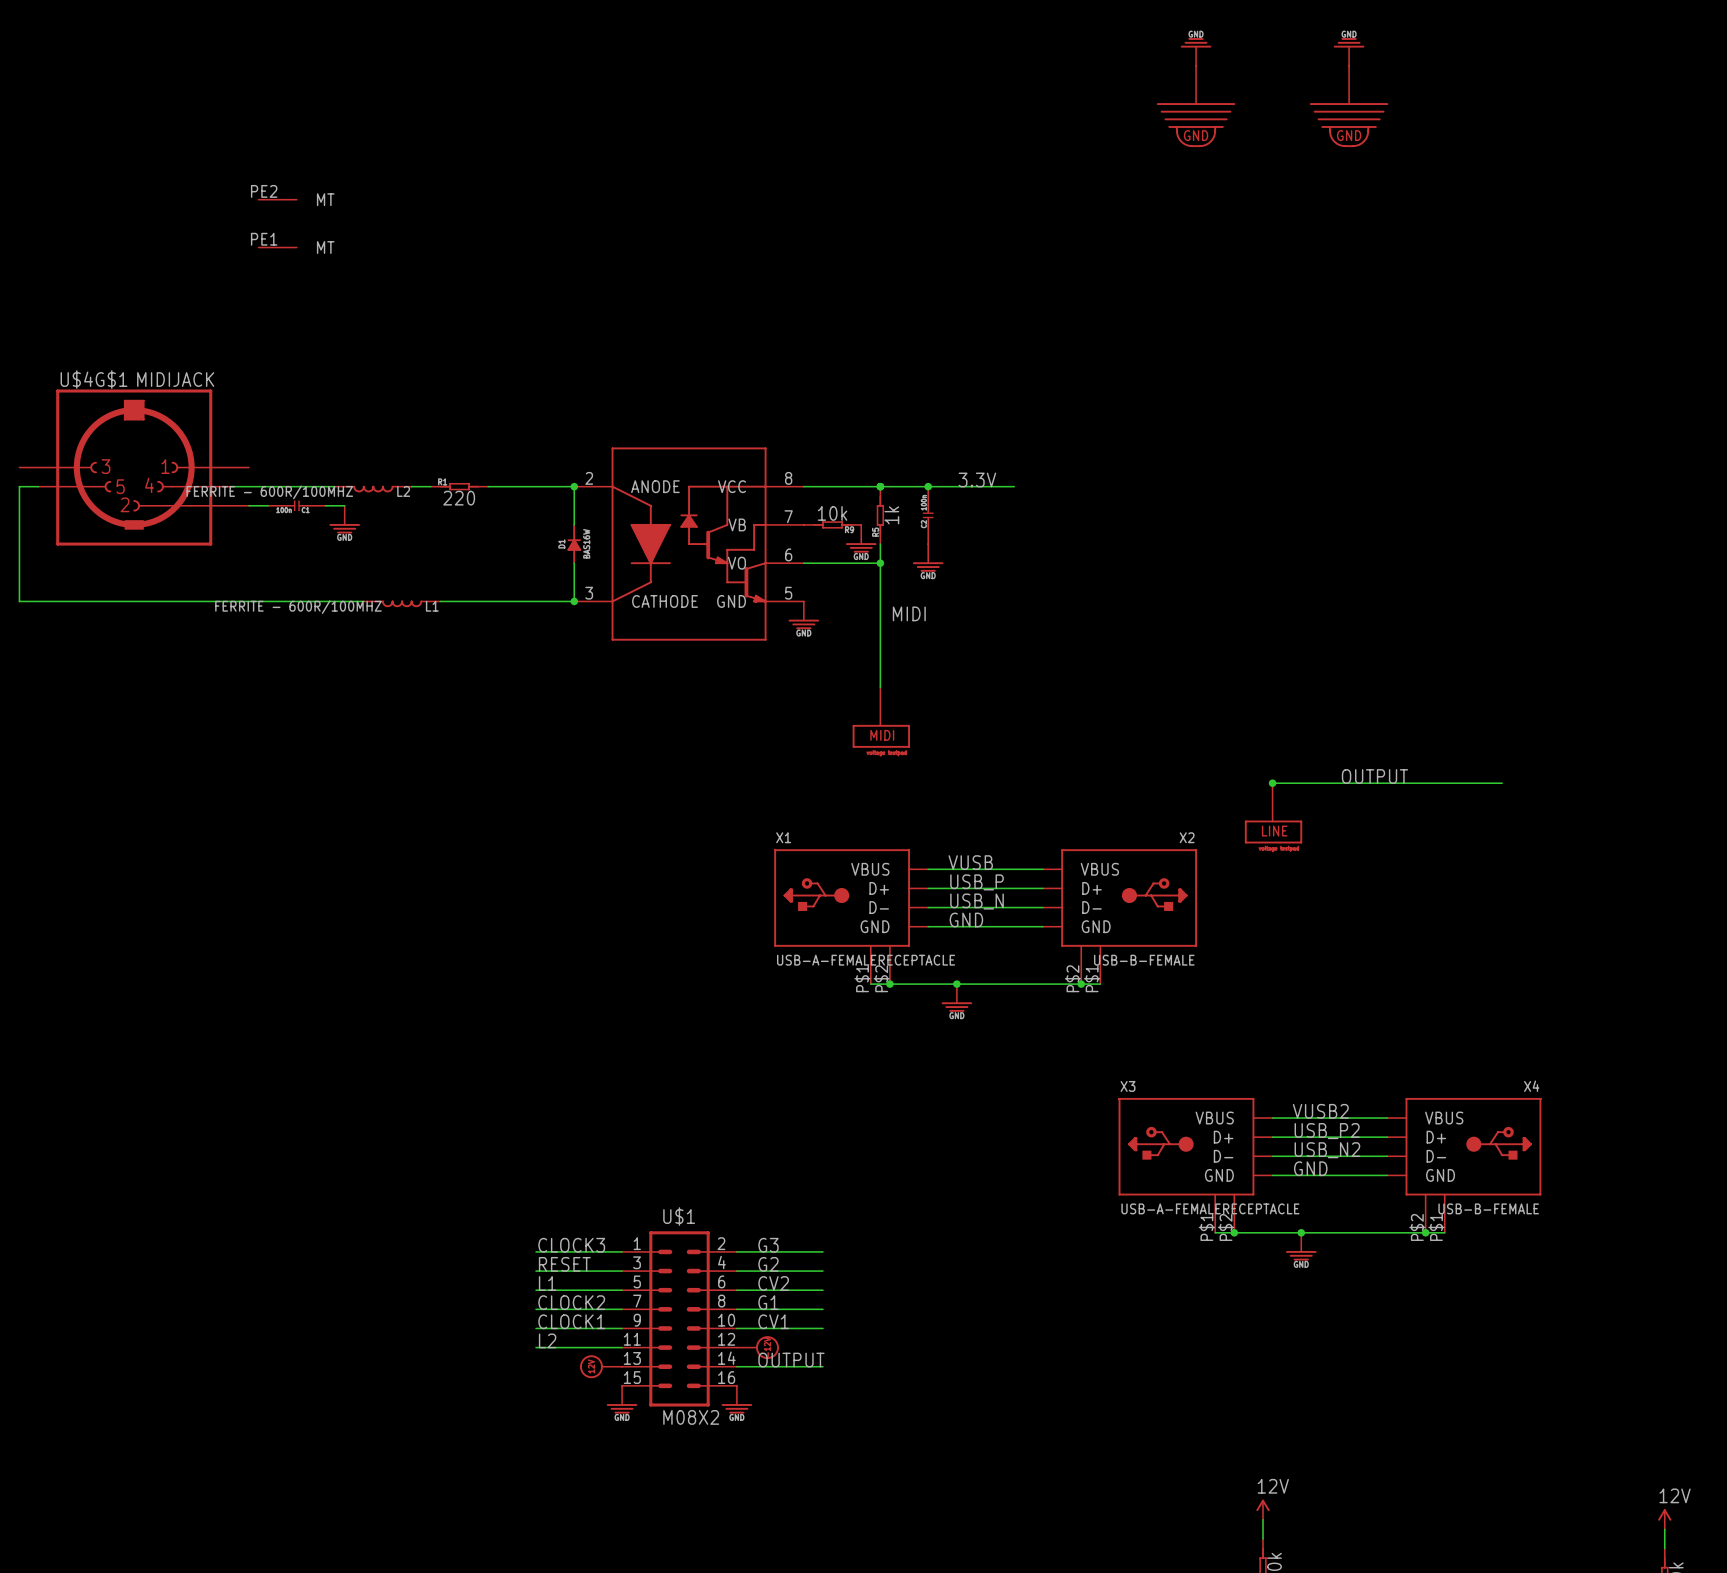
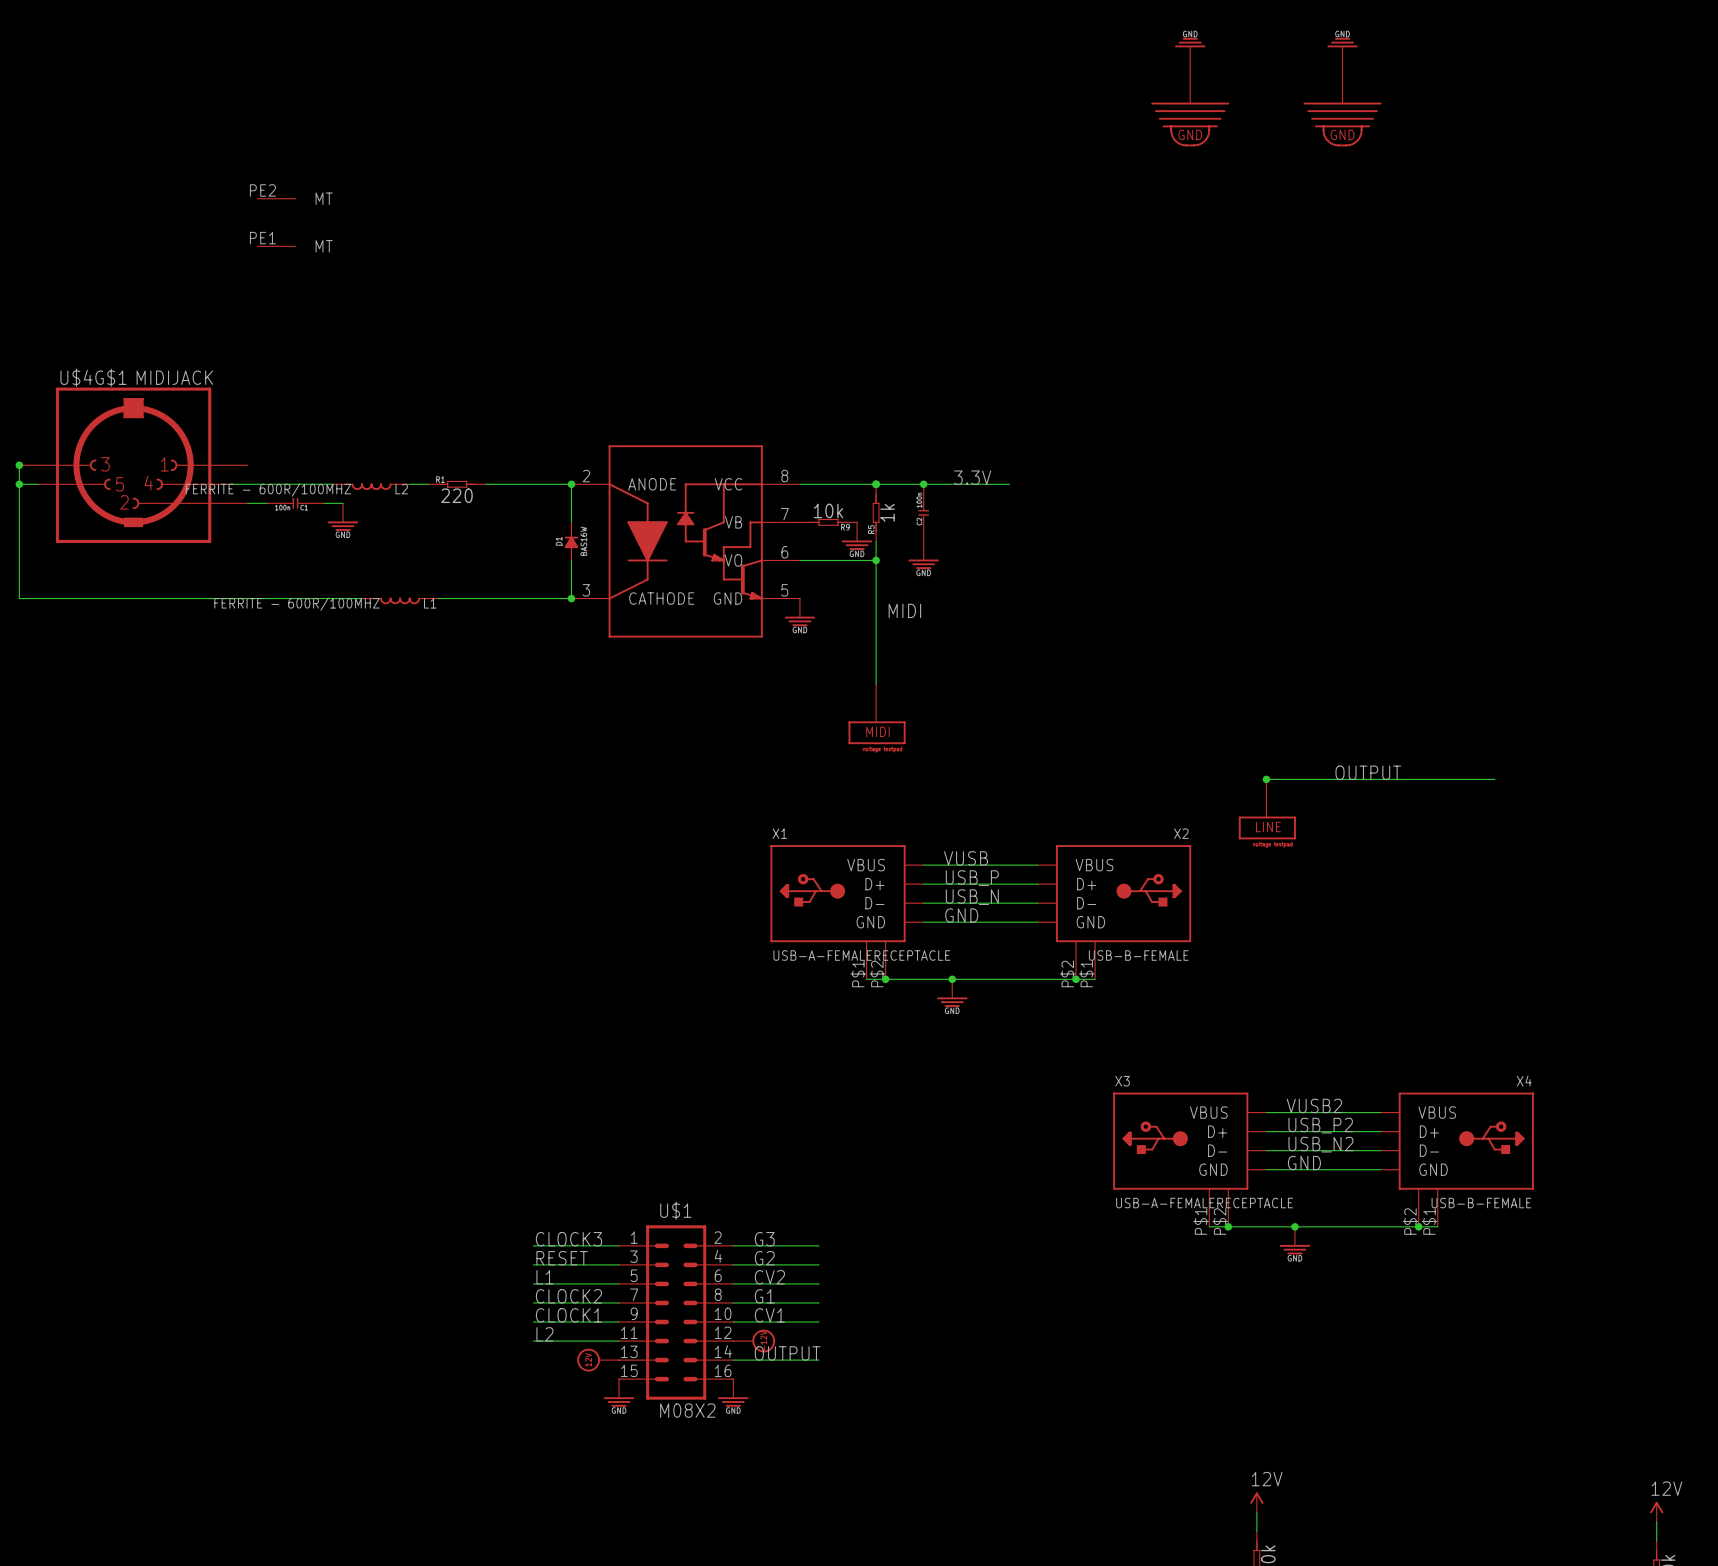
wire: none -> (19, 465) (19, 484)
junction: none -> (19, 465)
junction: none -> (19, 484)

